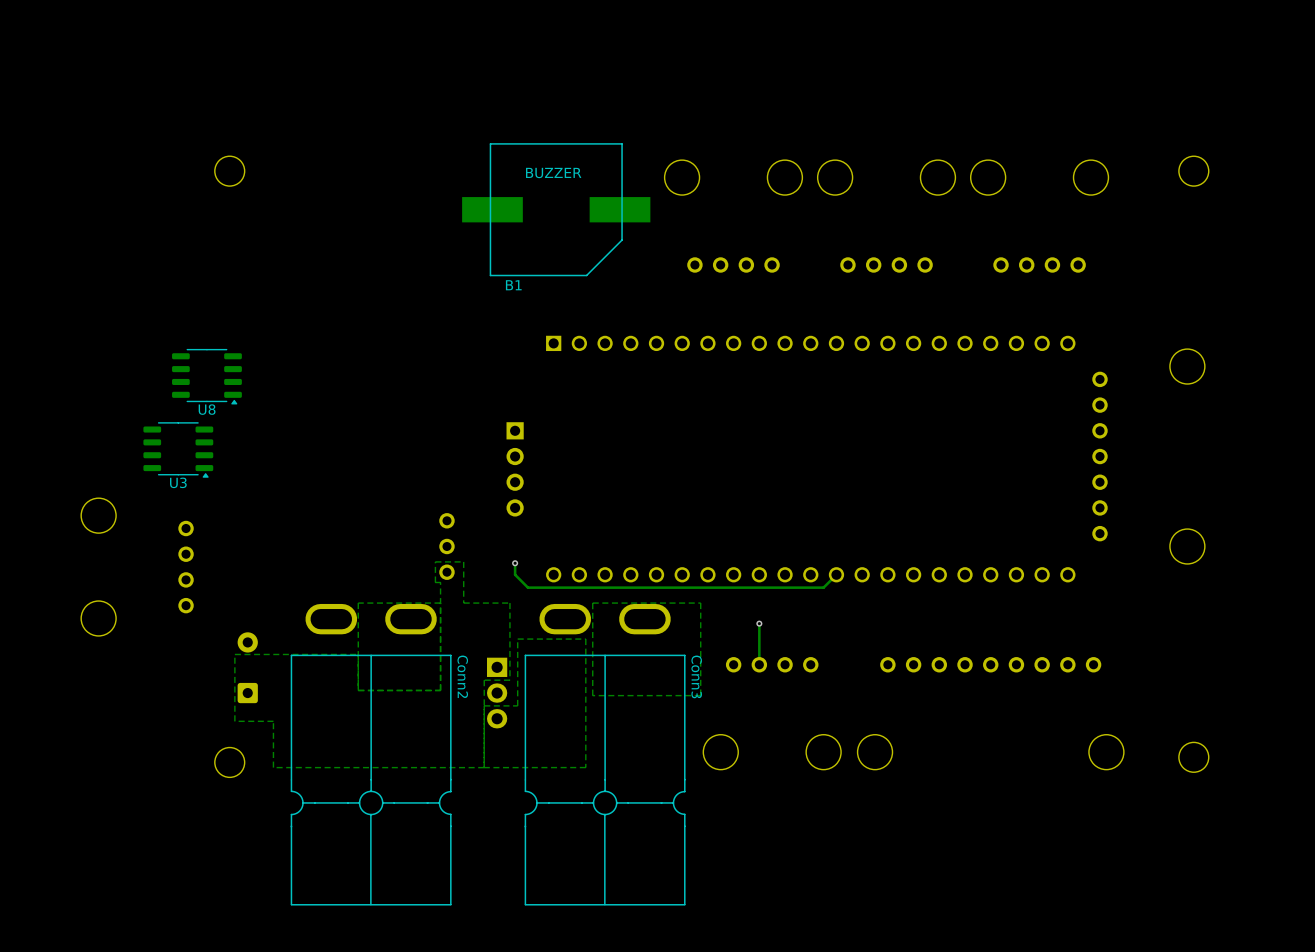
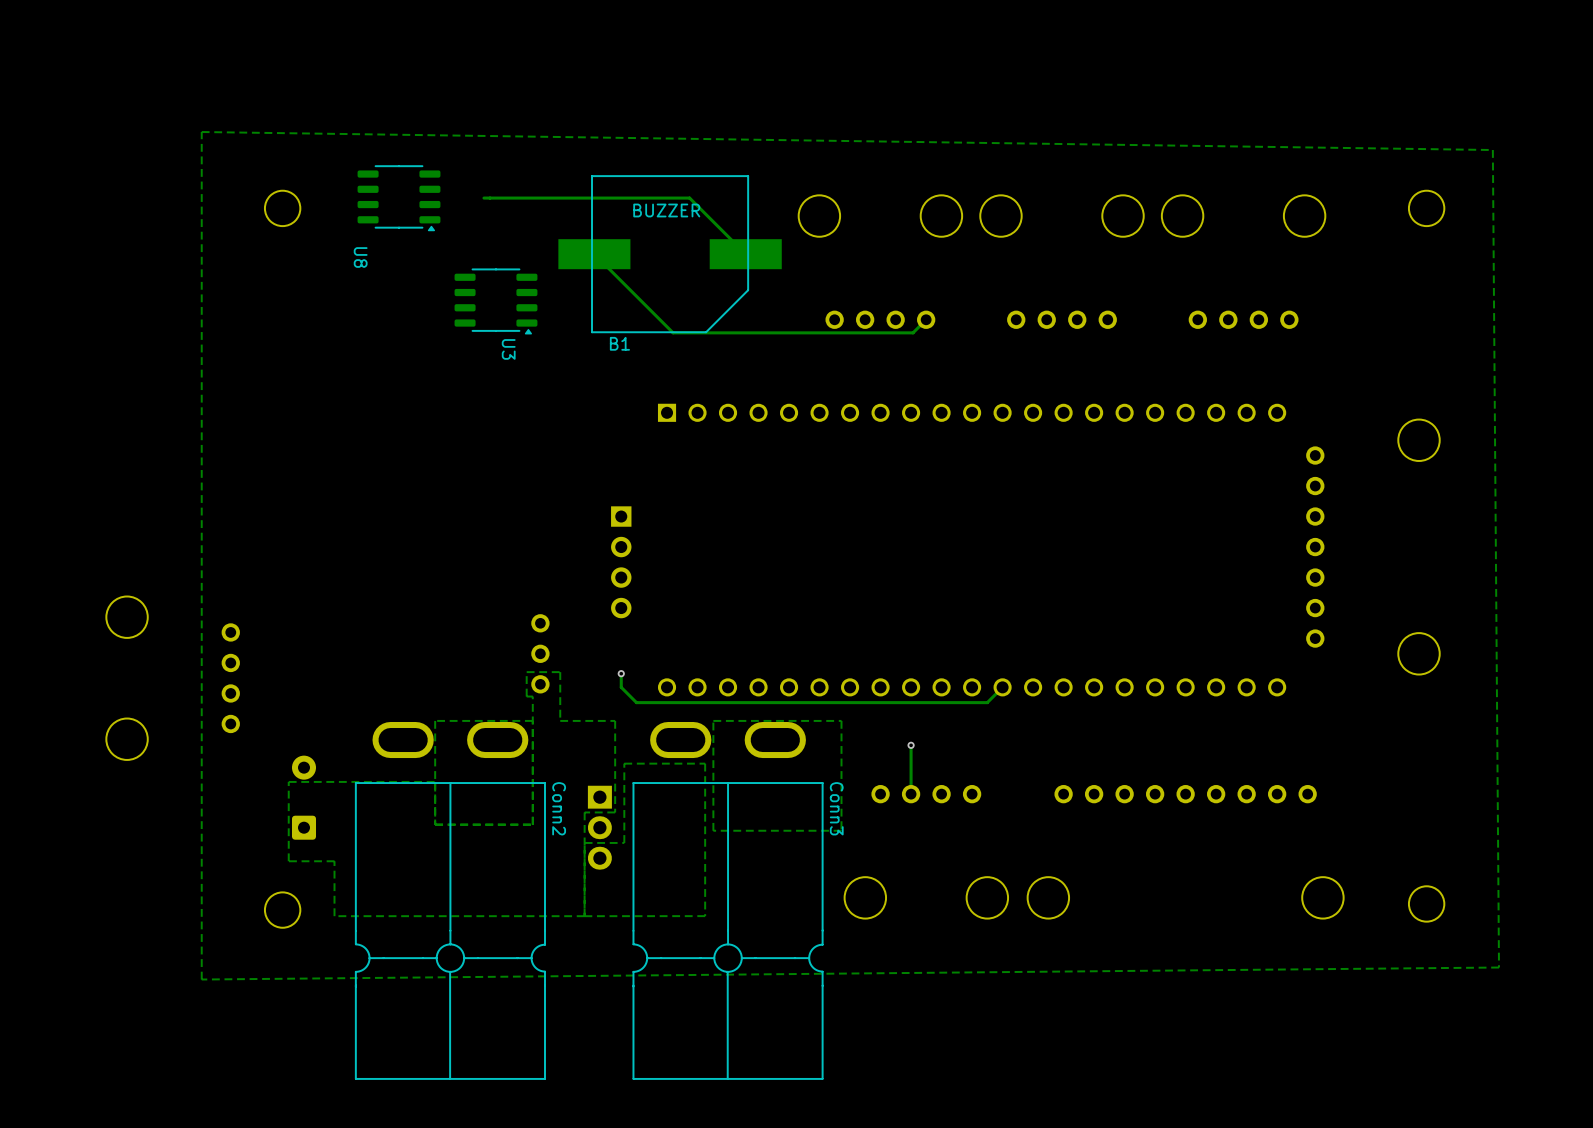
zone outline: none -> (201, 132) (201, 979) (1499, 967) (1492, 150) (201, 132)
track: none -> (483, 198) (689, 198) (745, 254)
track: none -> (594, 254) (673, 332) (913, 332) (926, 319)
U8 position: (206, 376) -> (399, 198)
U8 name rotation: 0° (207, 409) -> 90° clockwise (360, 257)
U8 name position: U8 (207, 409) -> U8 (360, 257)
U3 position: (178, 450) -> (495, 301)
U3 name rotation: 0° (178, 482) -> 90° clockwise (508, 349)

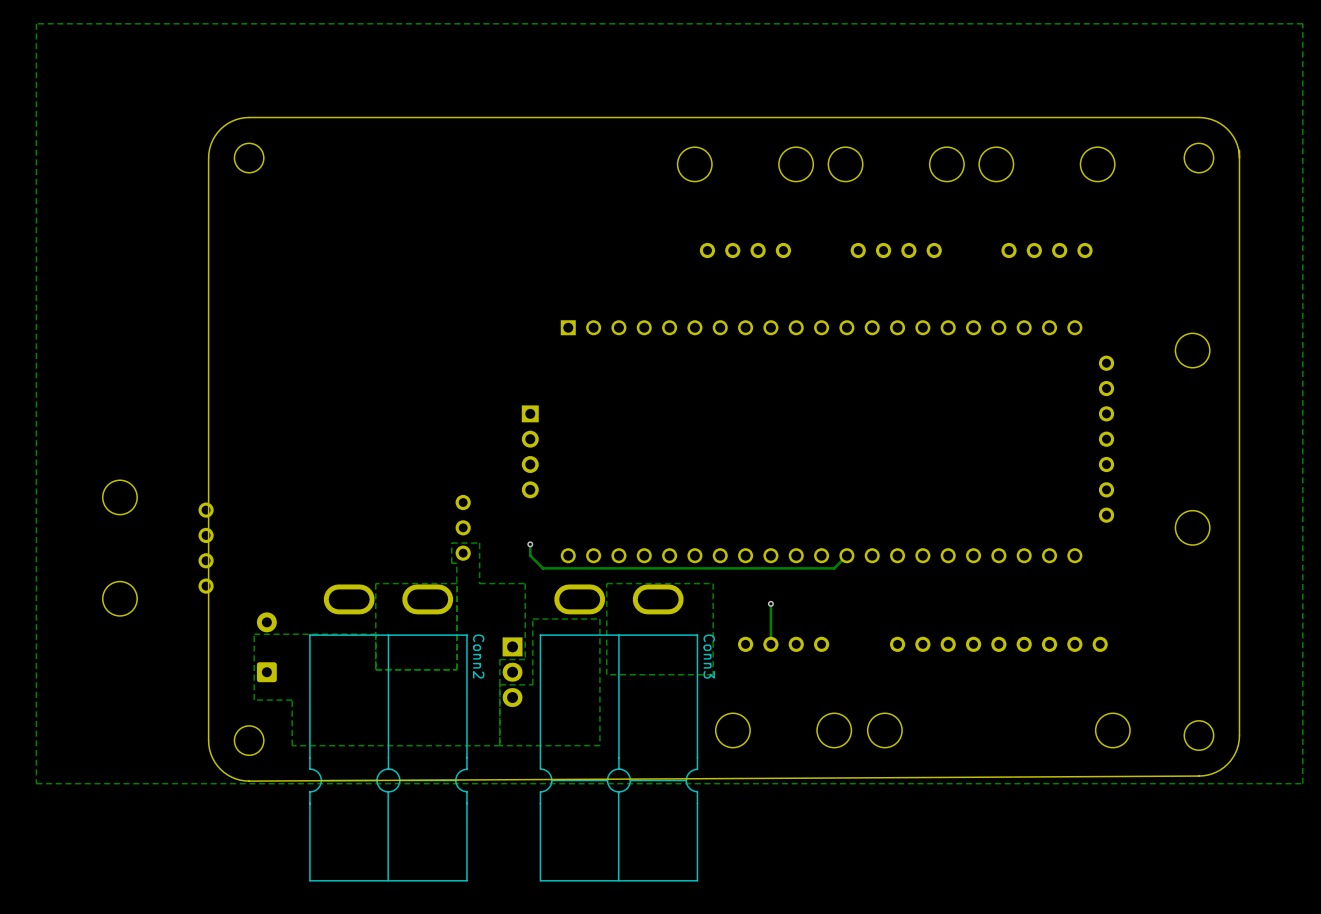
zone outline: (201, 132) (201, 979) (1499, 967) (1492, 150) (201, 132) -> (1302, 23) (1302, 783) (36, 783) (36, 23) (1302, 23)
U8: (399, 198) -> none
track: (483, 198) (689, 198) (745, 254) -> none
board edge: none -> (1239, 150) (1239, 735) (1235, 753) (1227, 764) (1220, 769) (1212, 773) (1198, 776) (249, 781) (235, 778) (227, 774) (214, 762) (210, 753) (208, 740) (208, 158) (212, 140) (217, 132) (227, 123) (240, 118) (249, 117) (1198, 117) (1216, 121) (1227, 129) (1235, 140) (1238, 149) (1239, 153) (1239, 158)
track: (594, 254) (673, 332) (913, 332) (926, 319) -> none
B1: (670, 254) -> none
U3: (495, 301) -> none

